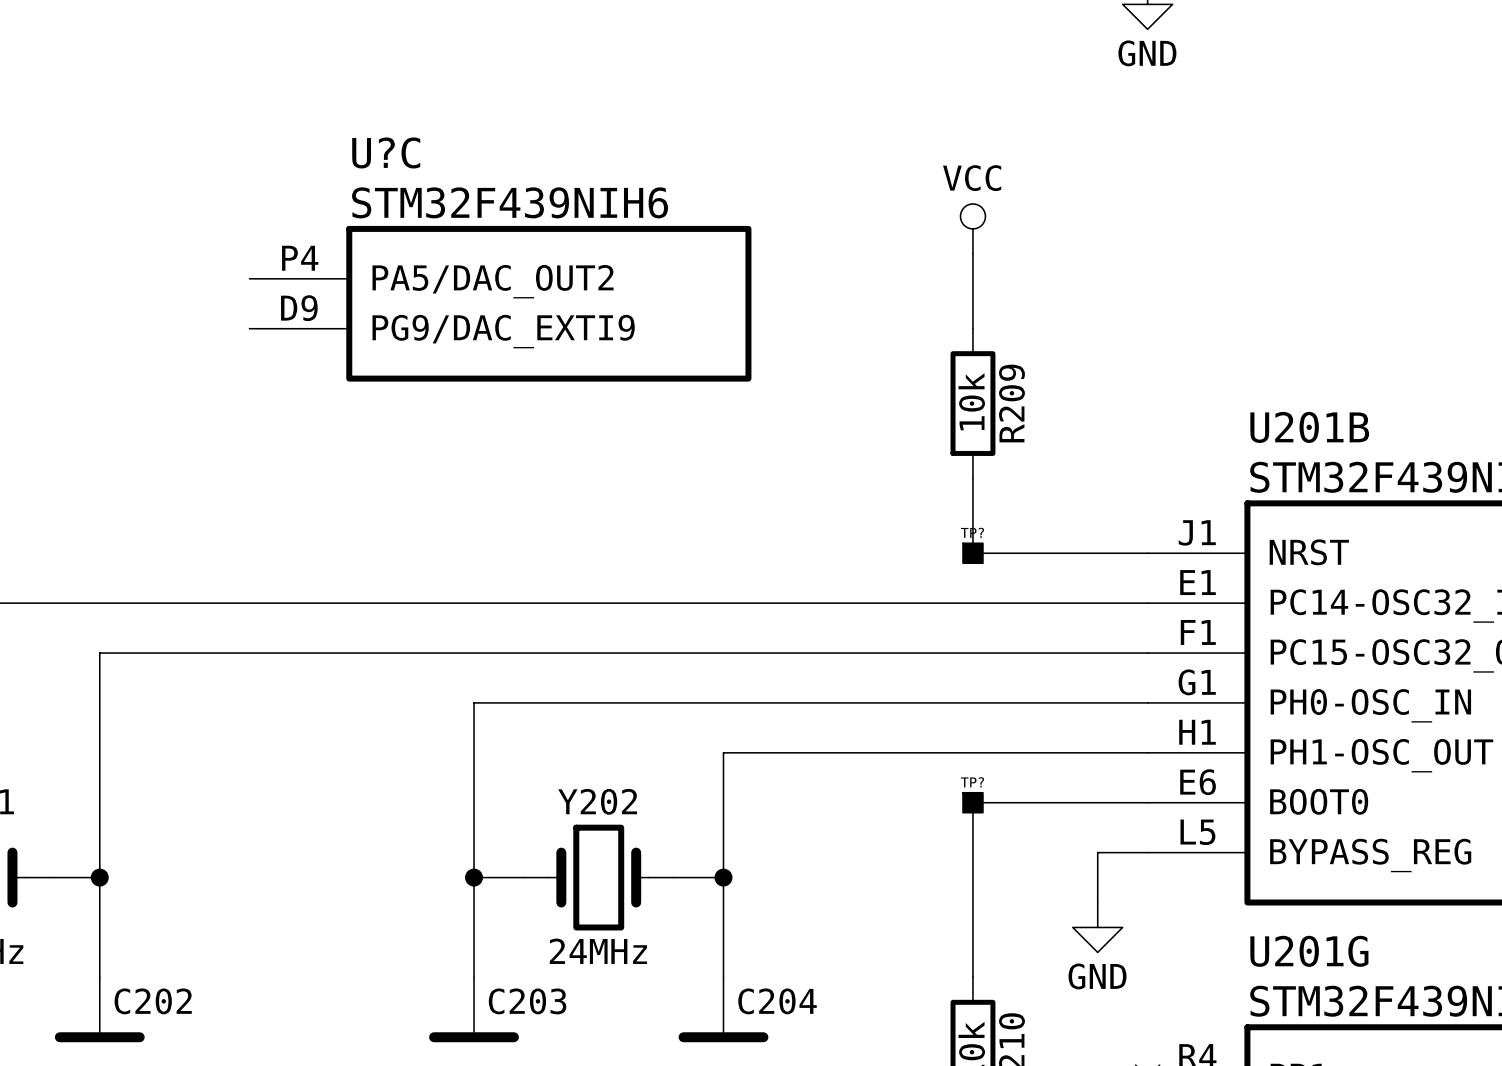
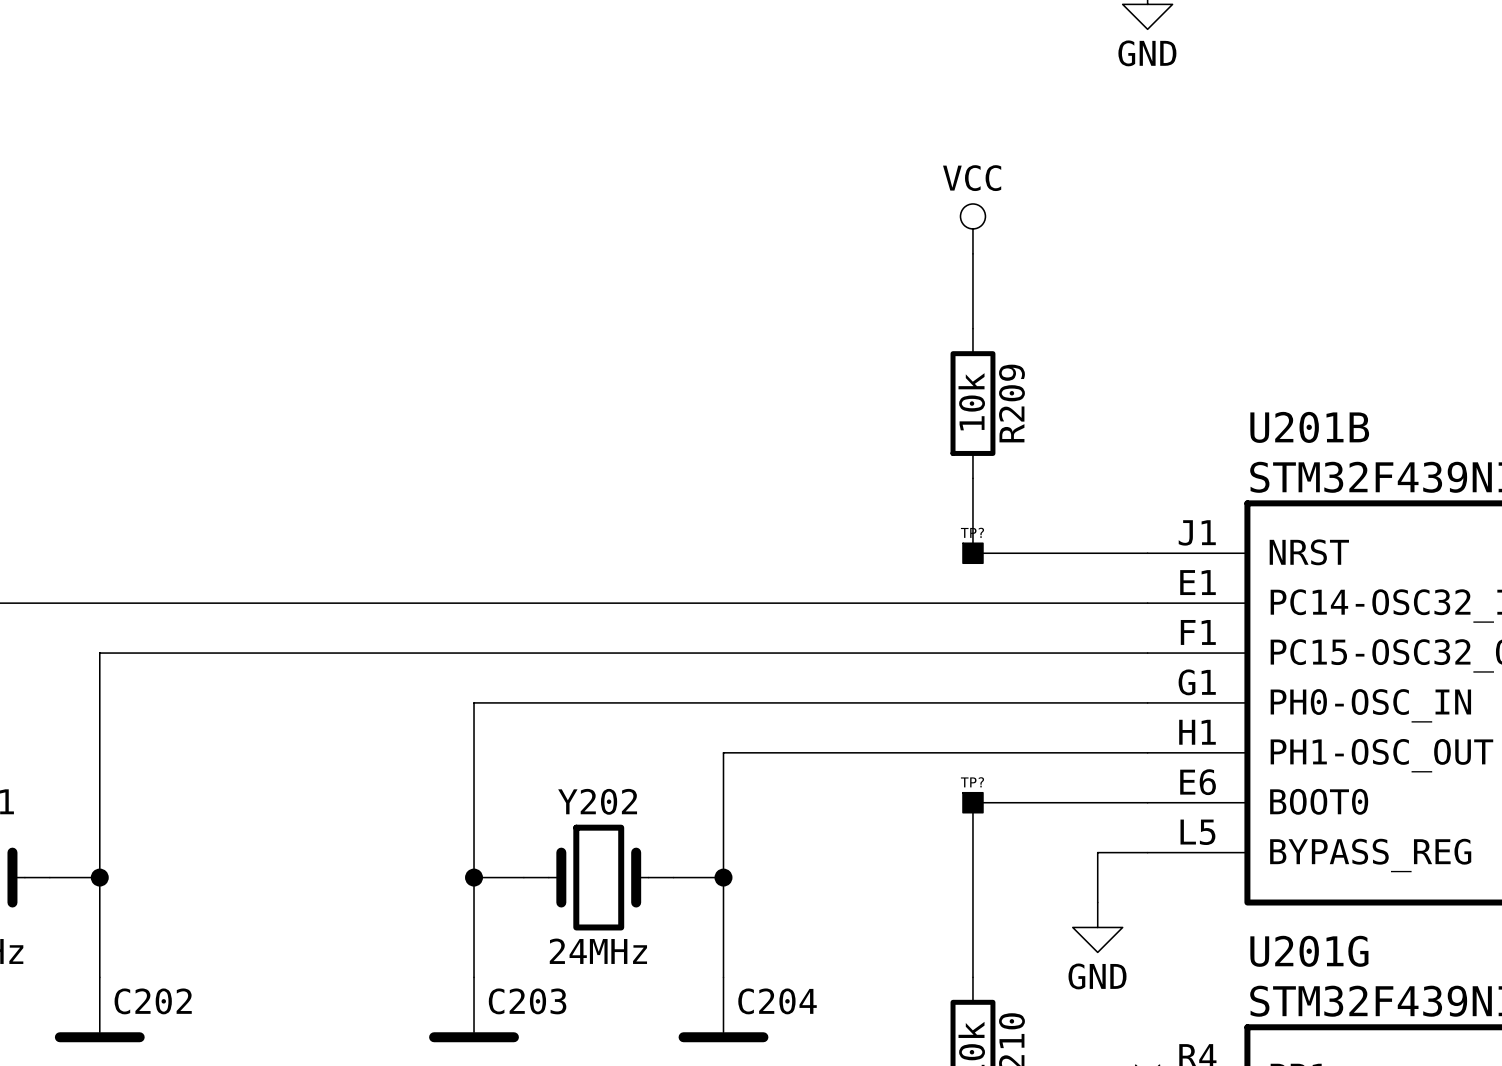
U?C: STM32F439NIH6 (500, 303) -> none

